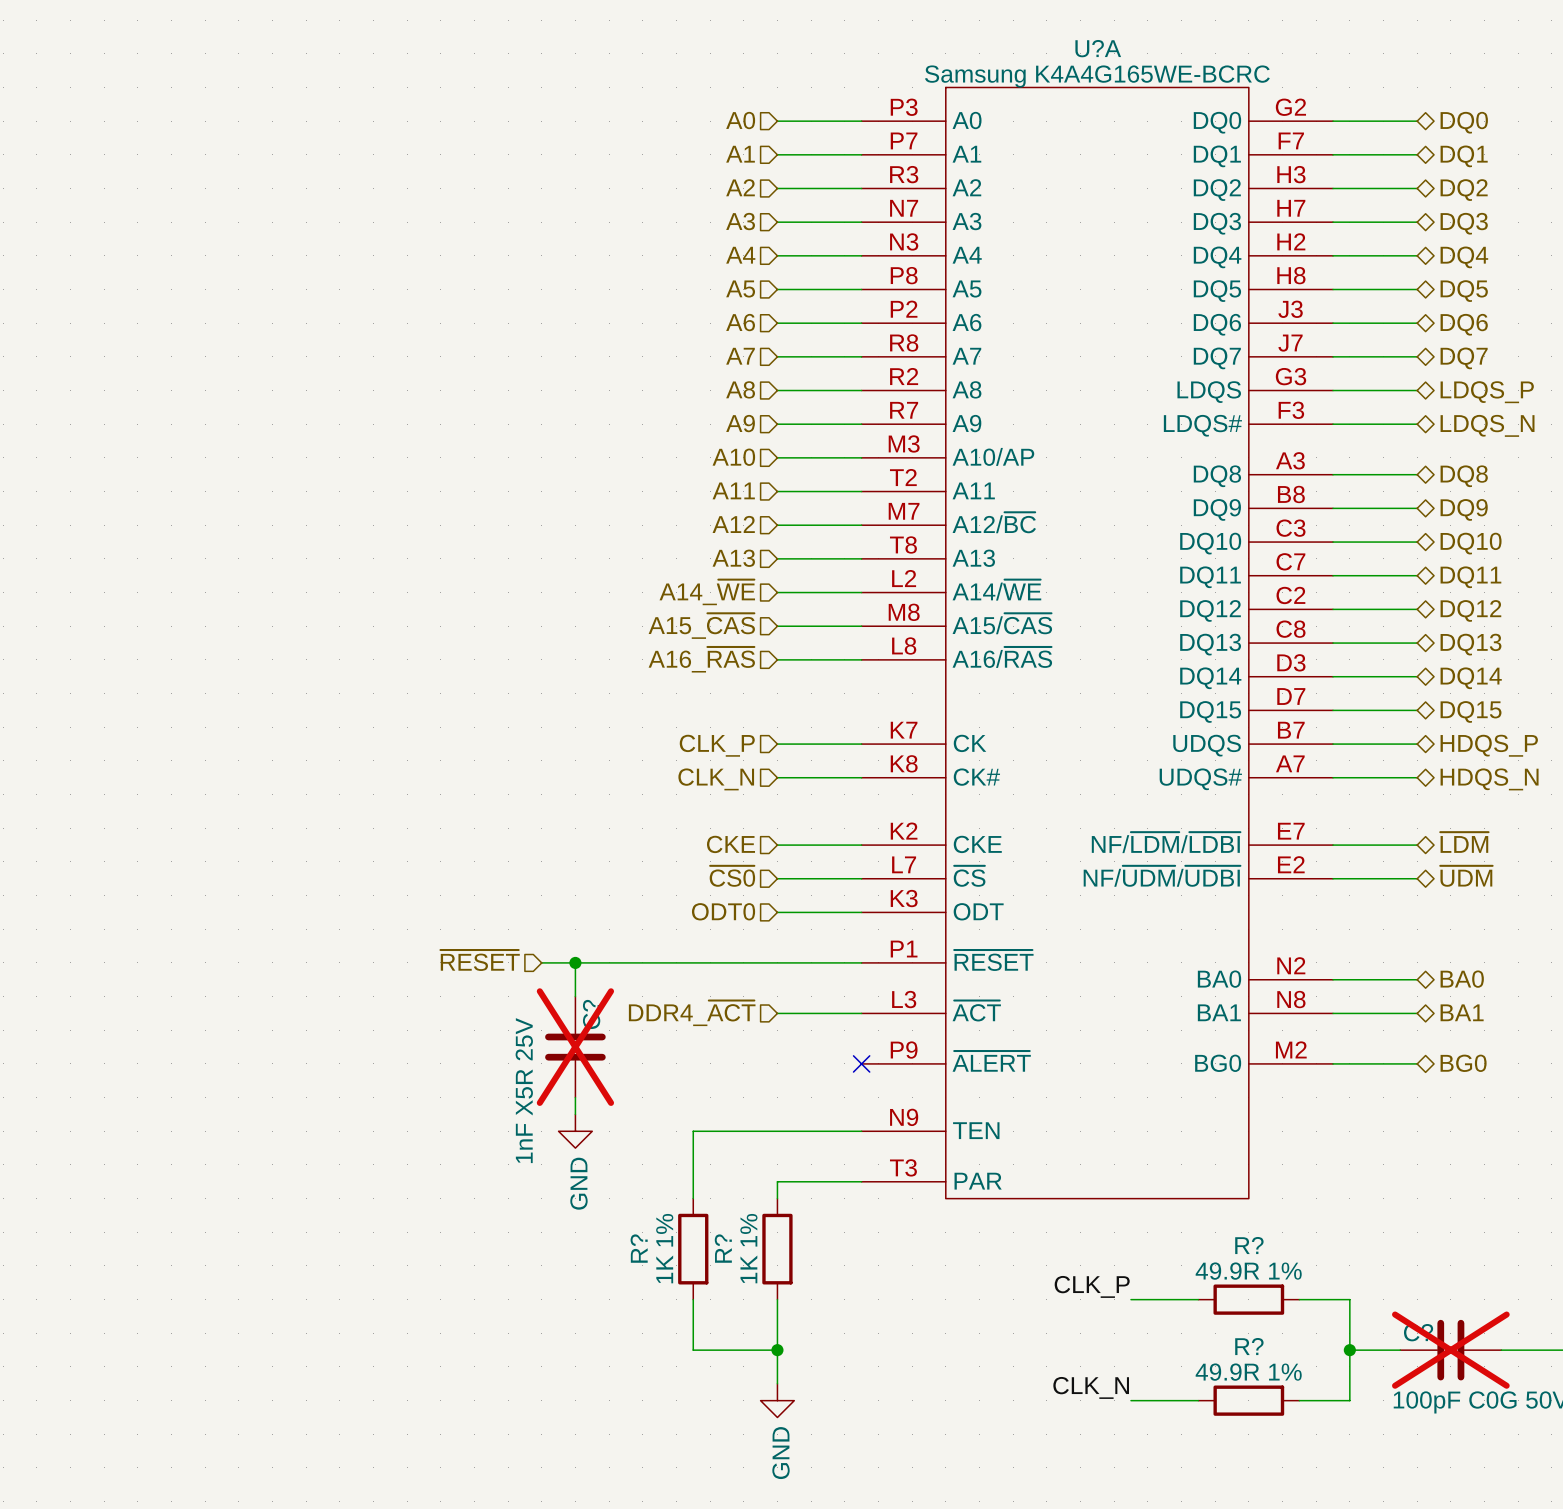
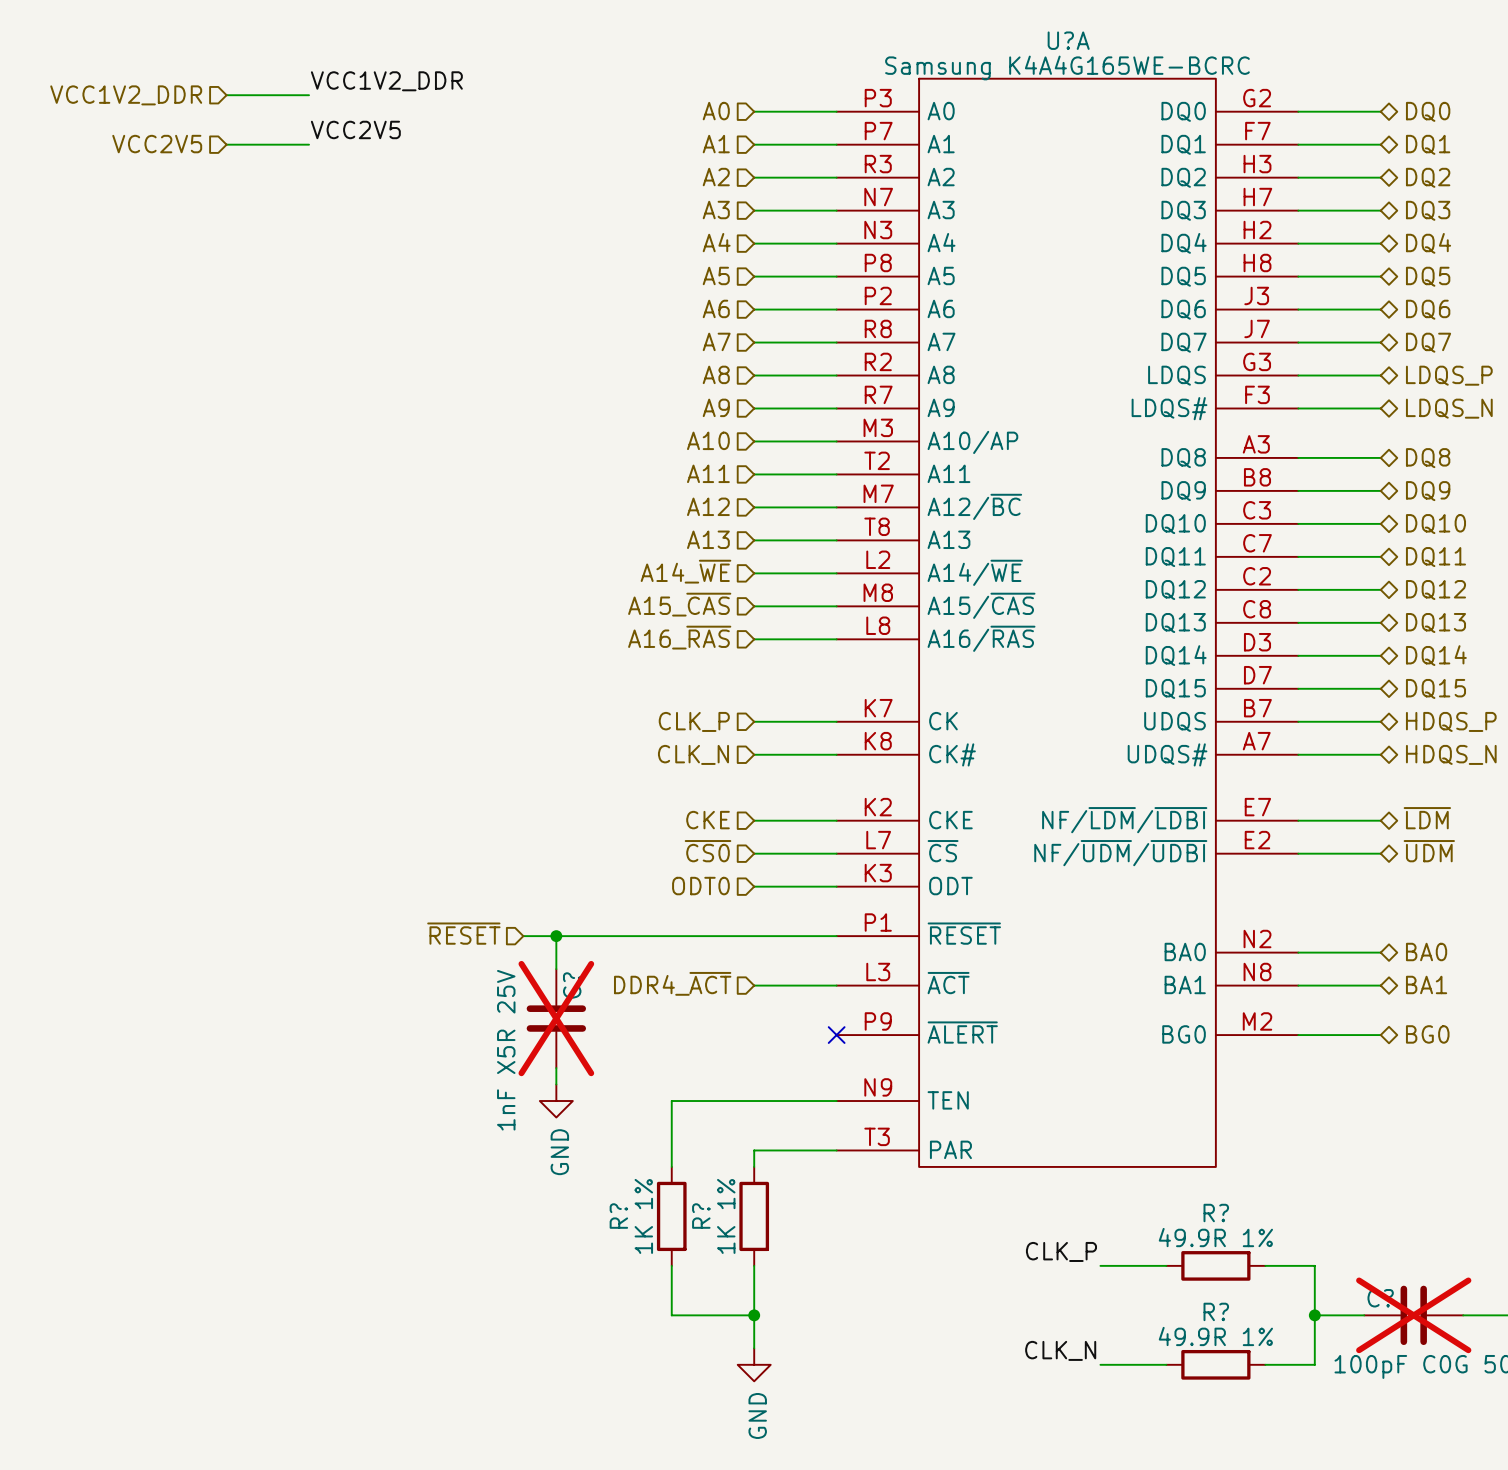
label: none -> VCC1V2_DDR (386, 81)
wire: none -> (226, 95) (309, 95)
hierarchical label: none -> VCC1V2_DDR (126, 95)
label: none -> VCC2V5 (355, 129)
hierarchical label: none -> VCC2V5 (157, 144)
wire: none -> (226, 144) (309, 144)

